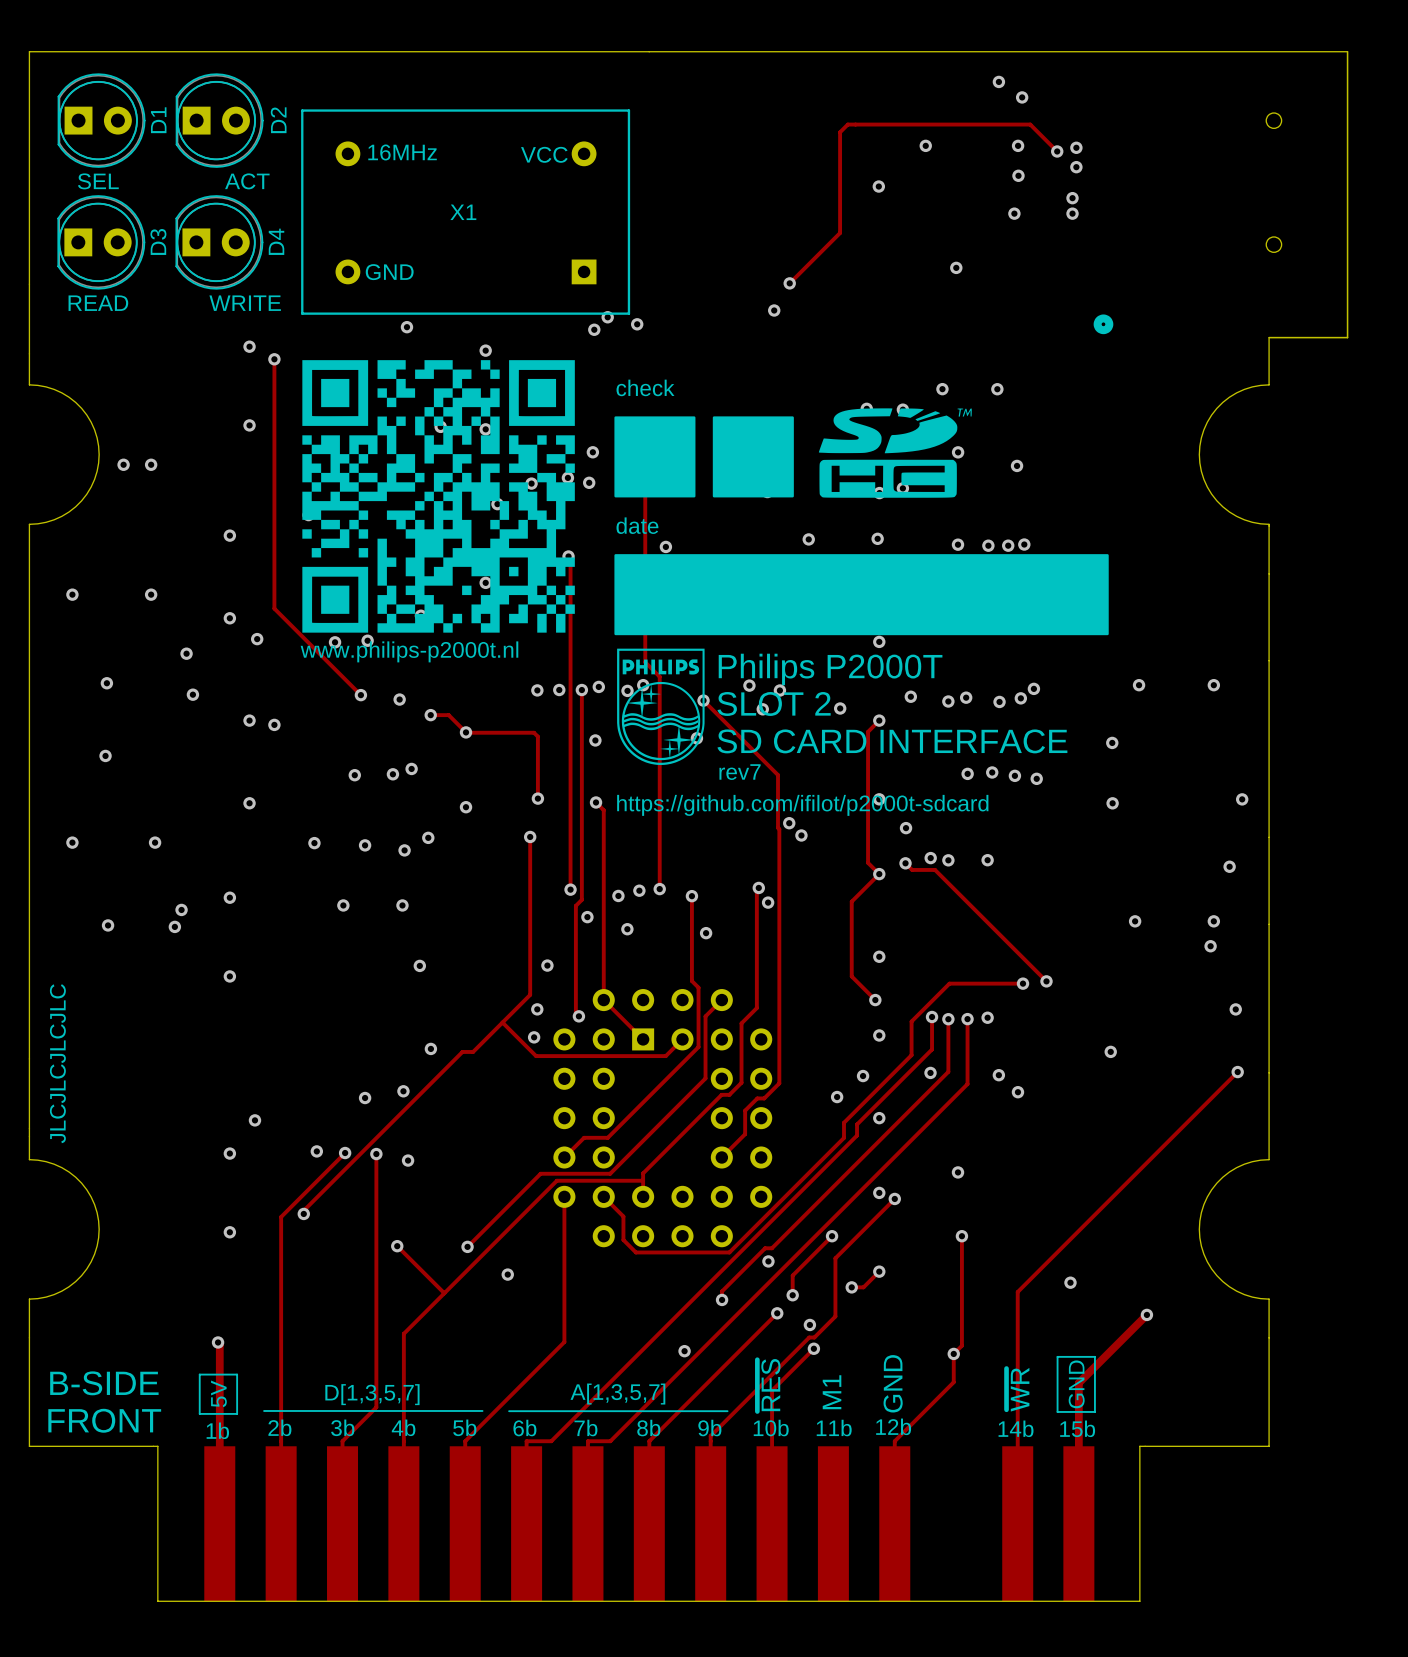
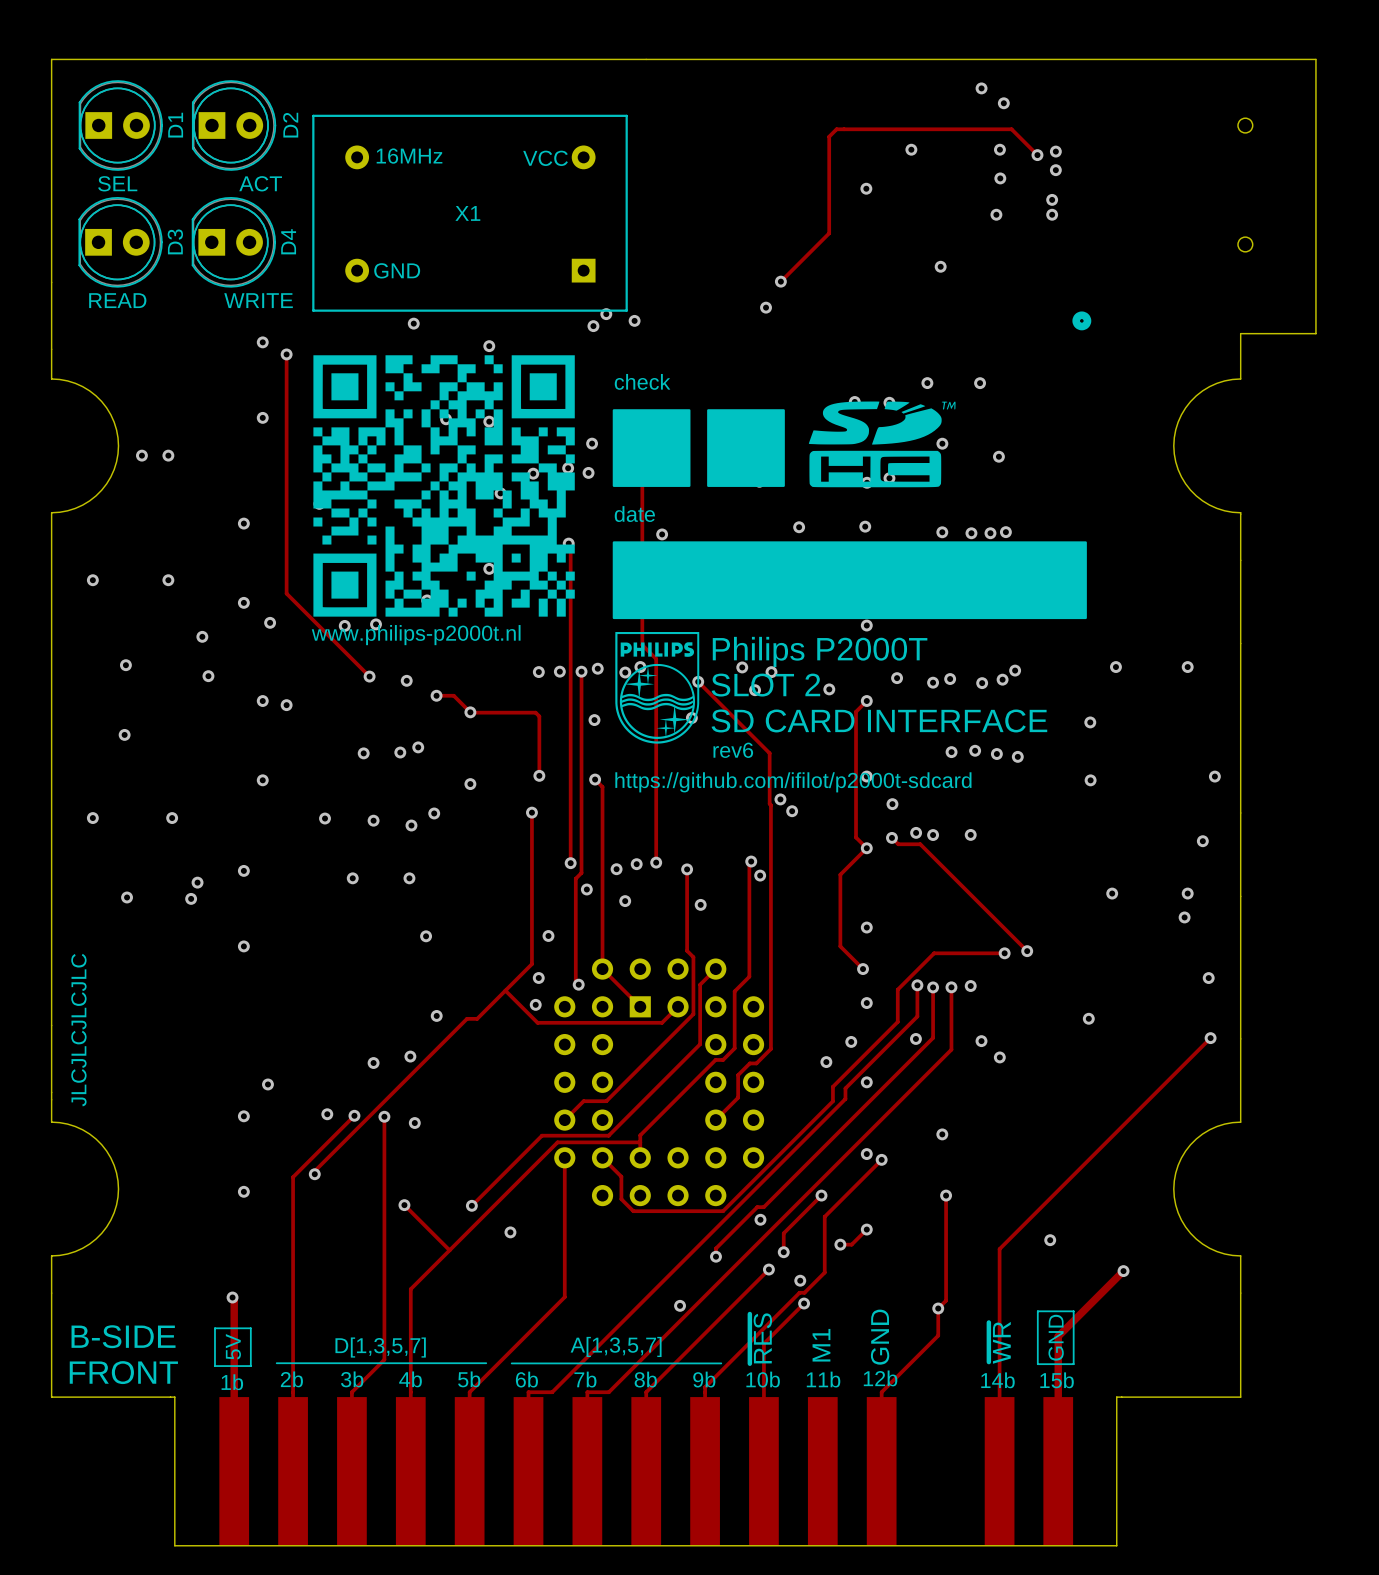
text: rev7 (740, 772) -> rev6 (733, 750)

